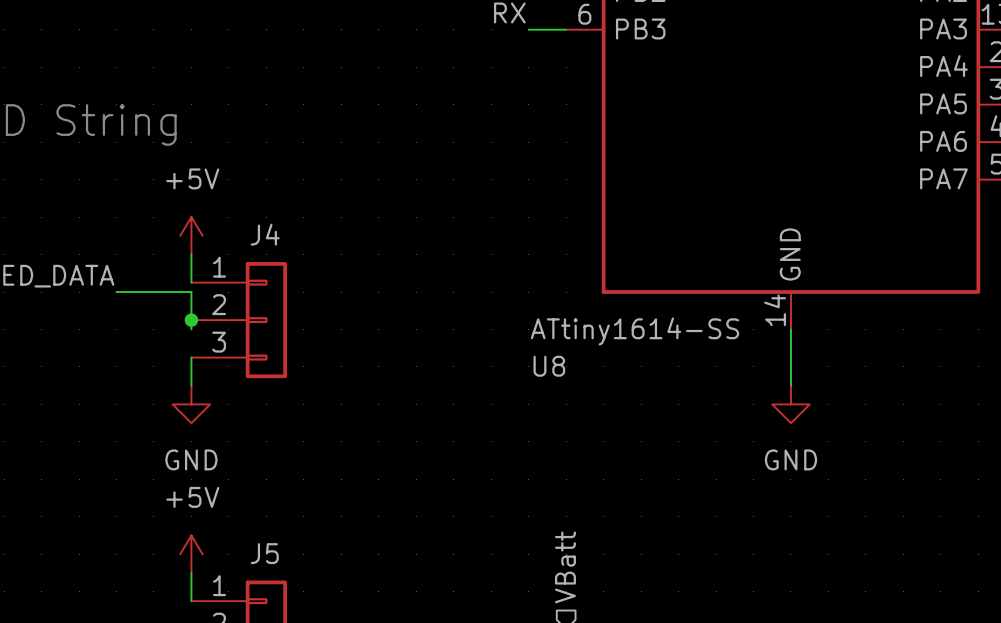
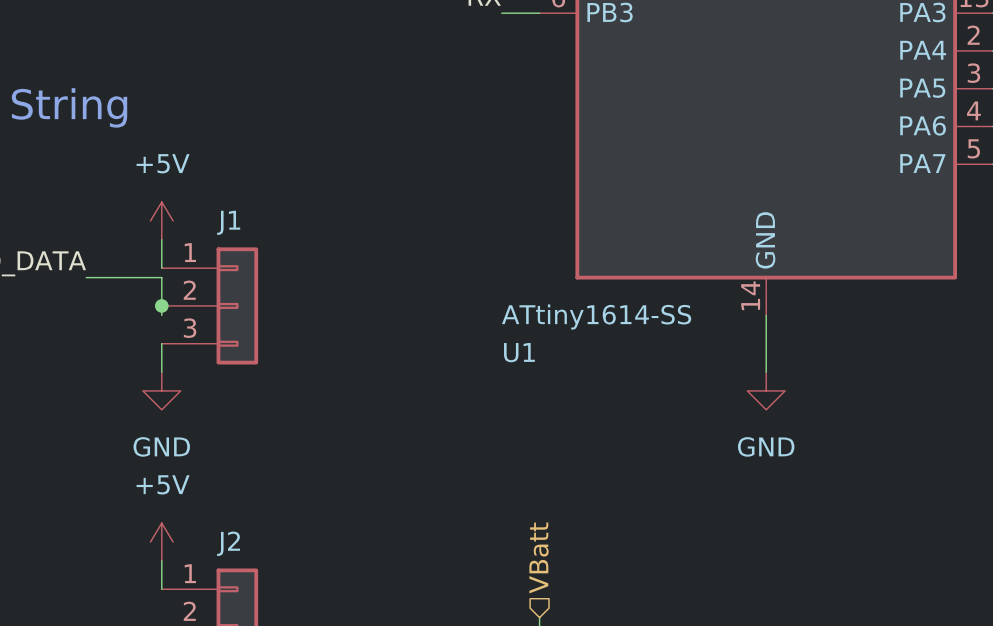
J4 name: J4 (265, 234) -> J1 (228, 222)
U8 name: U8 (549, 366) -> U1 (519, 352)
J5 name: J5 (264, 553) -> J2 (228, 543)

